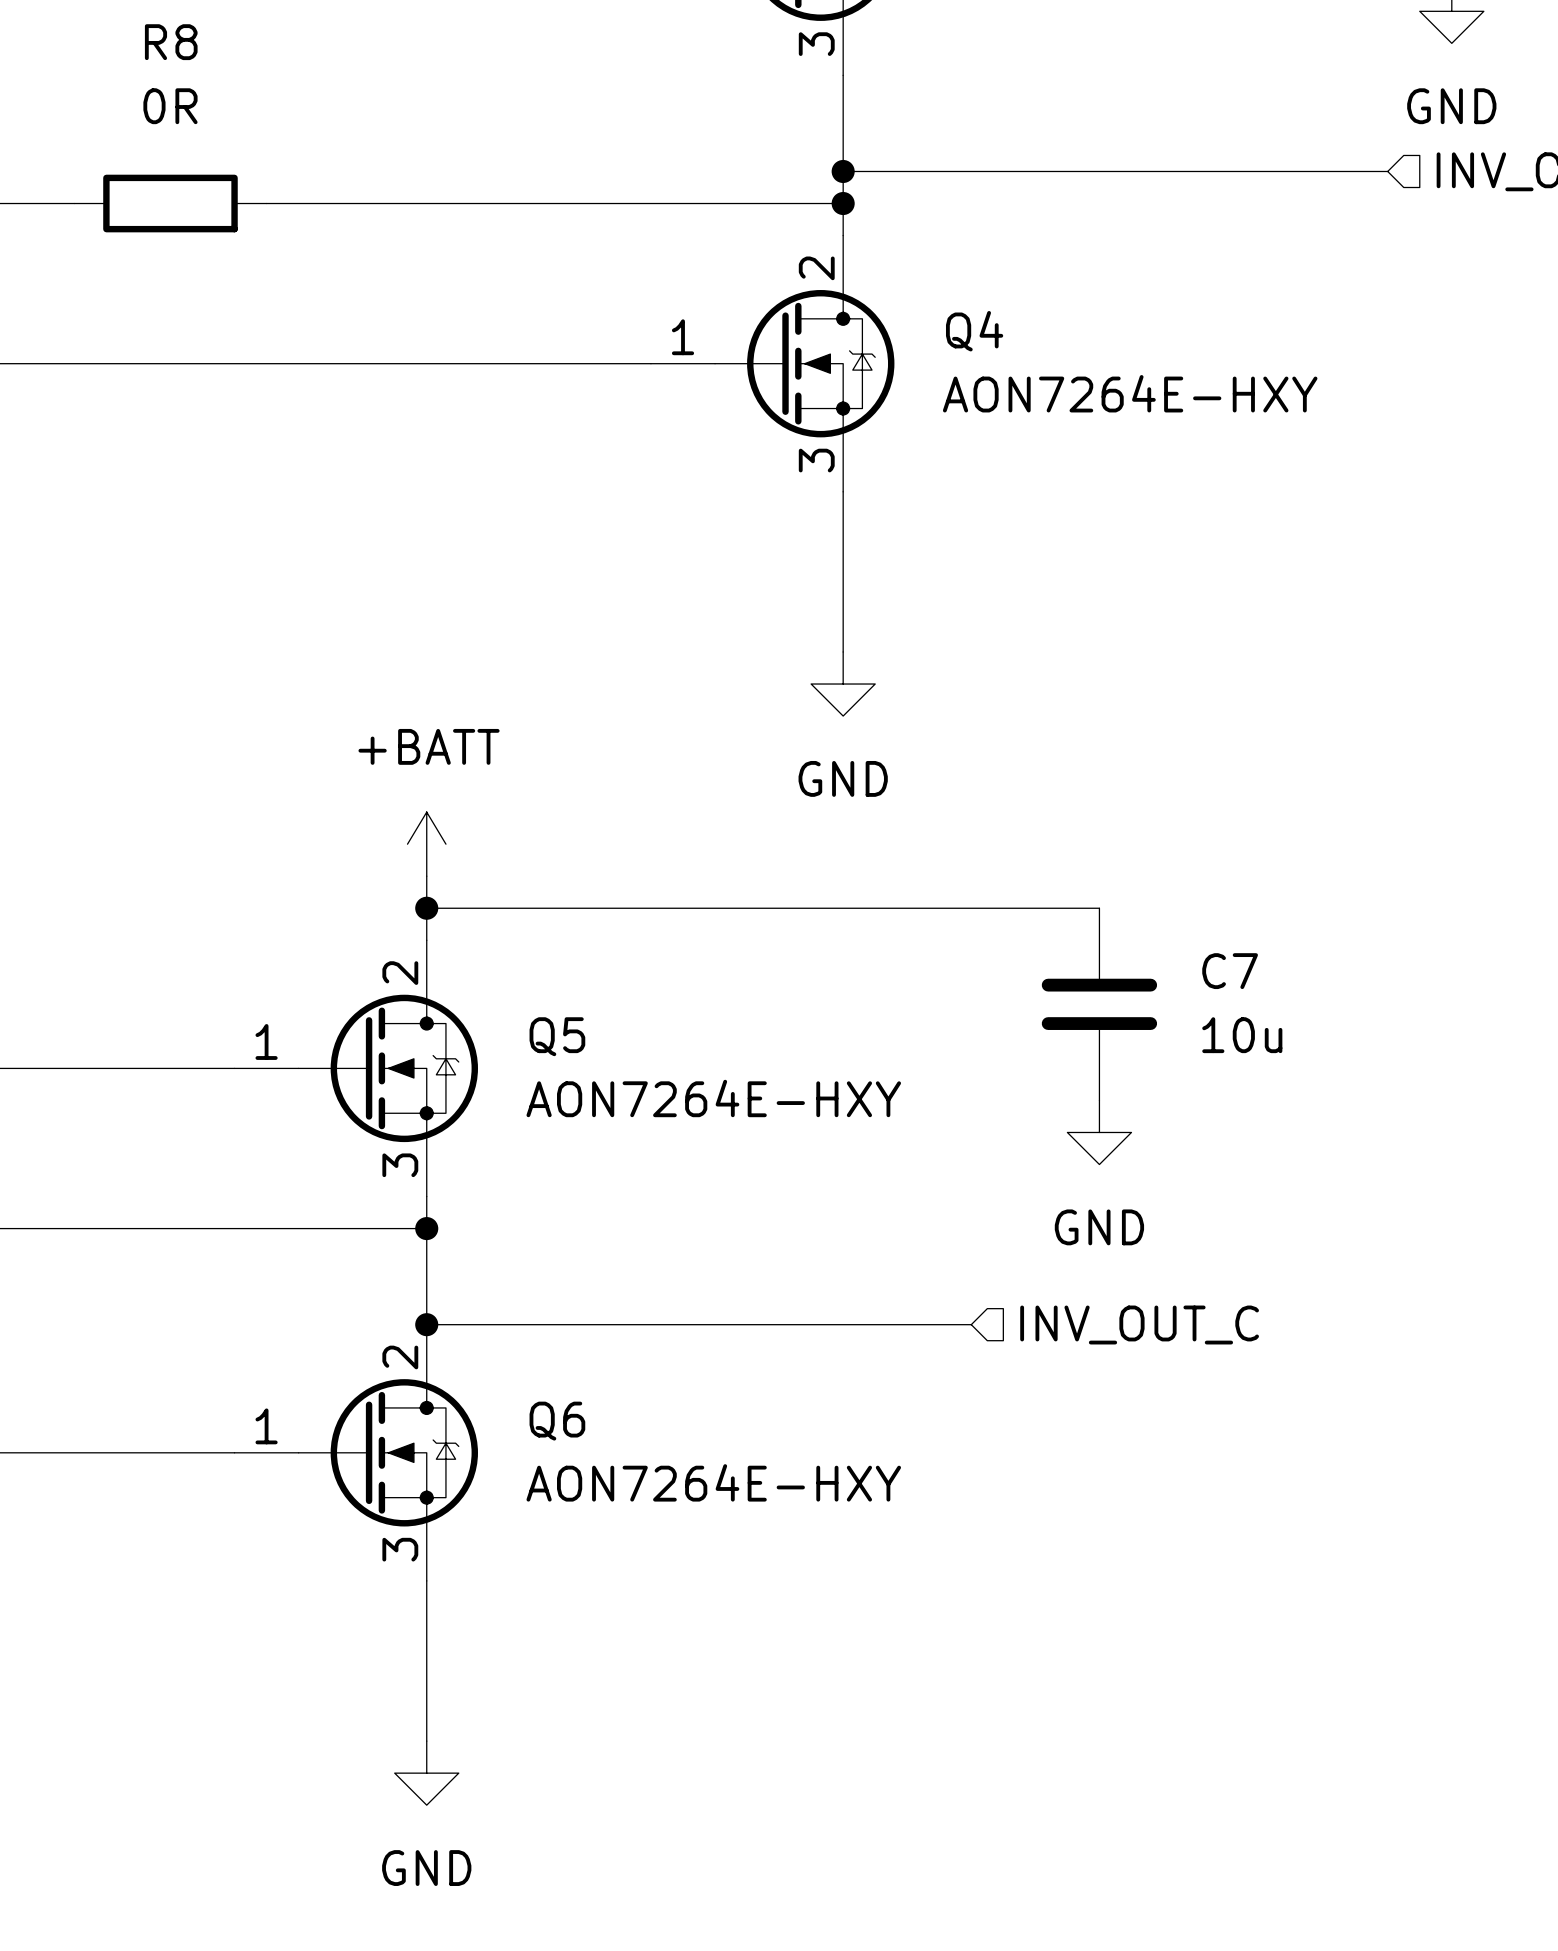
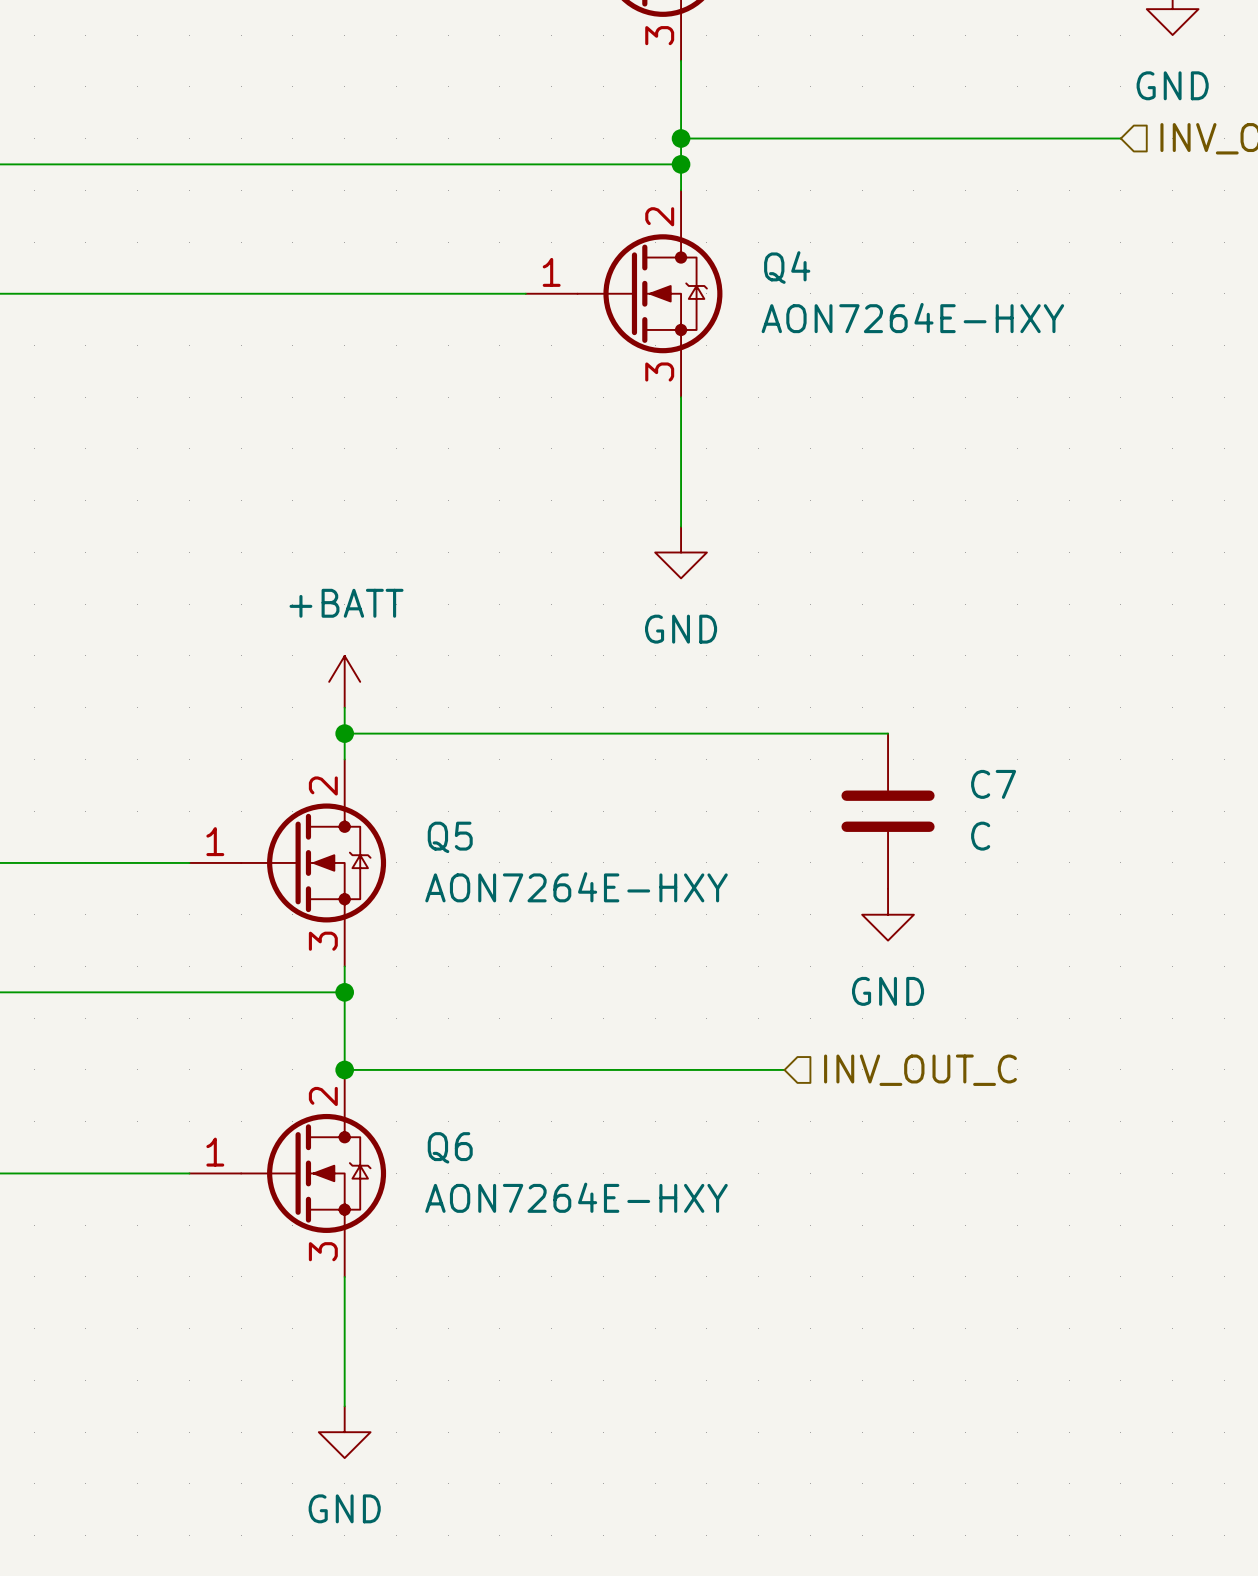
wire: none -> (60, 164) (215, 164)
R8: 0R (170, 203) -> none
C7 value: 10u (1242, 1035) -> C (980, 836)

